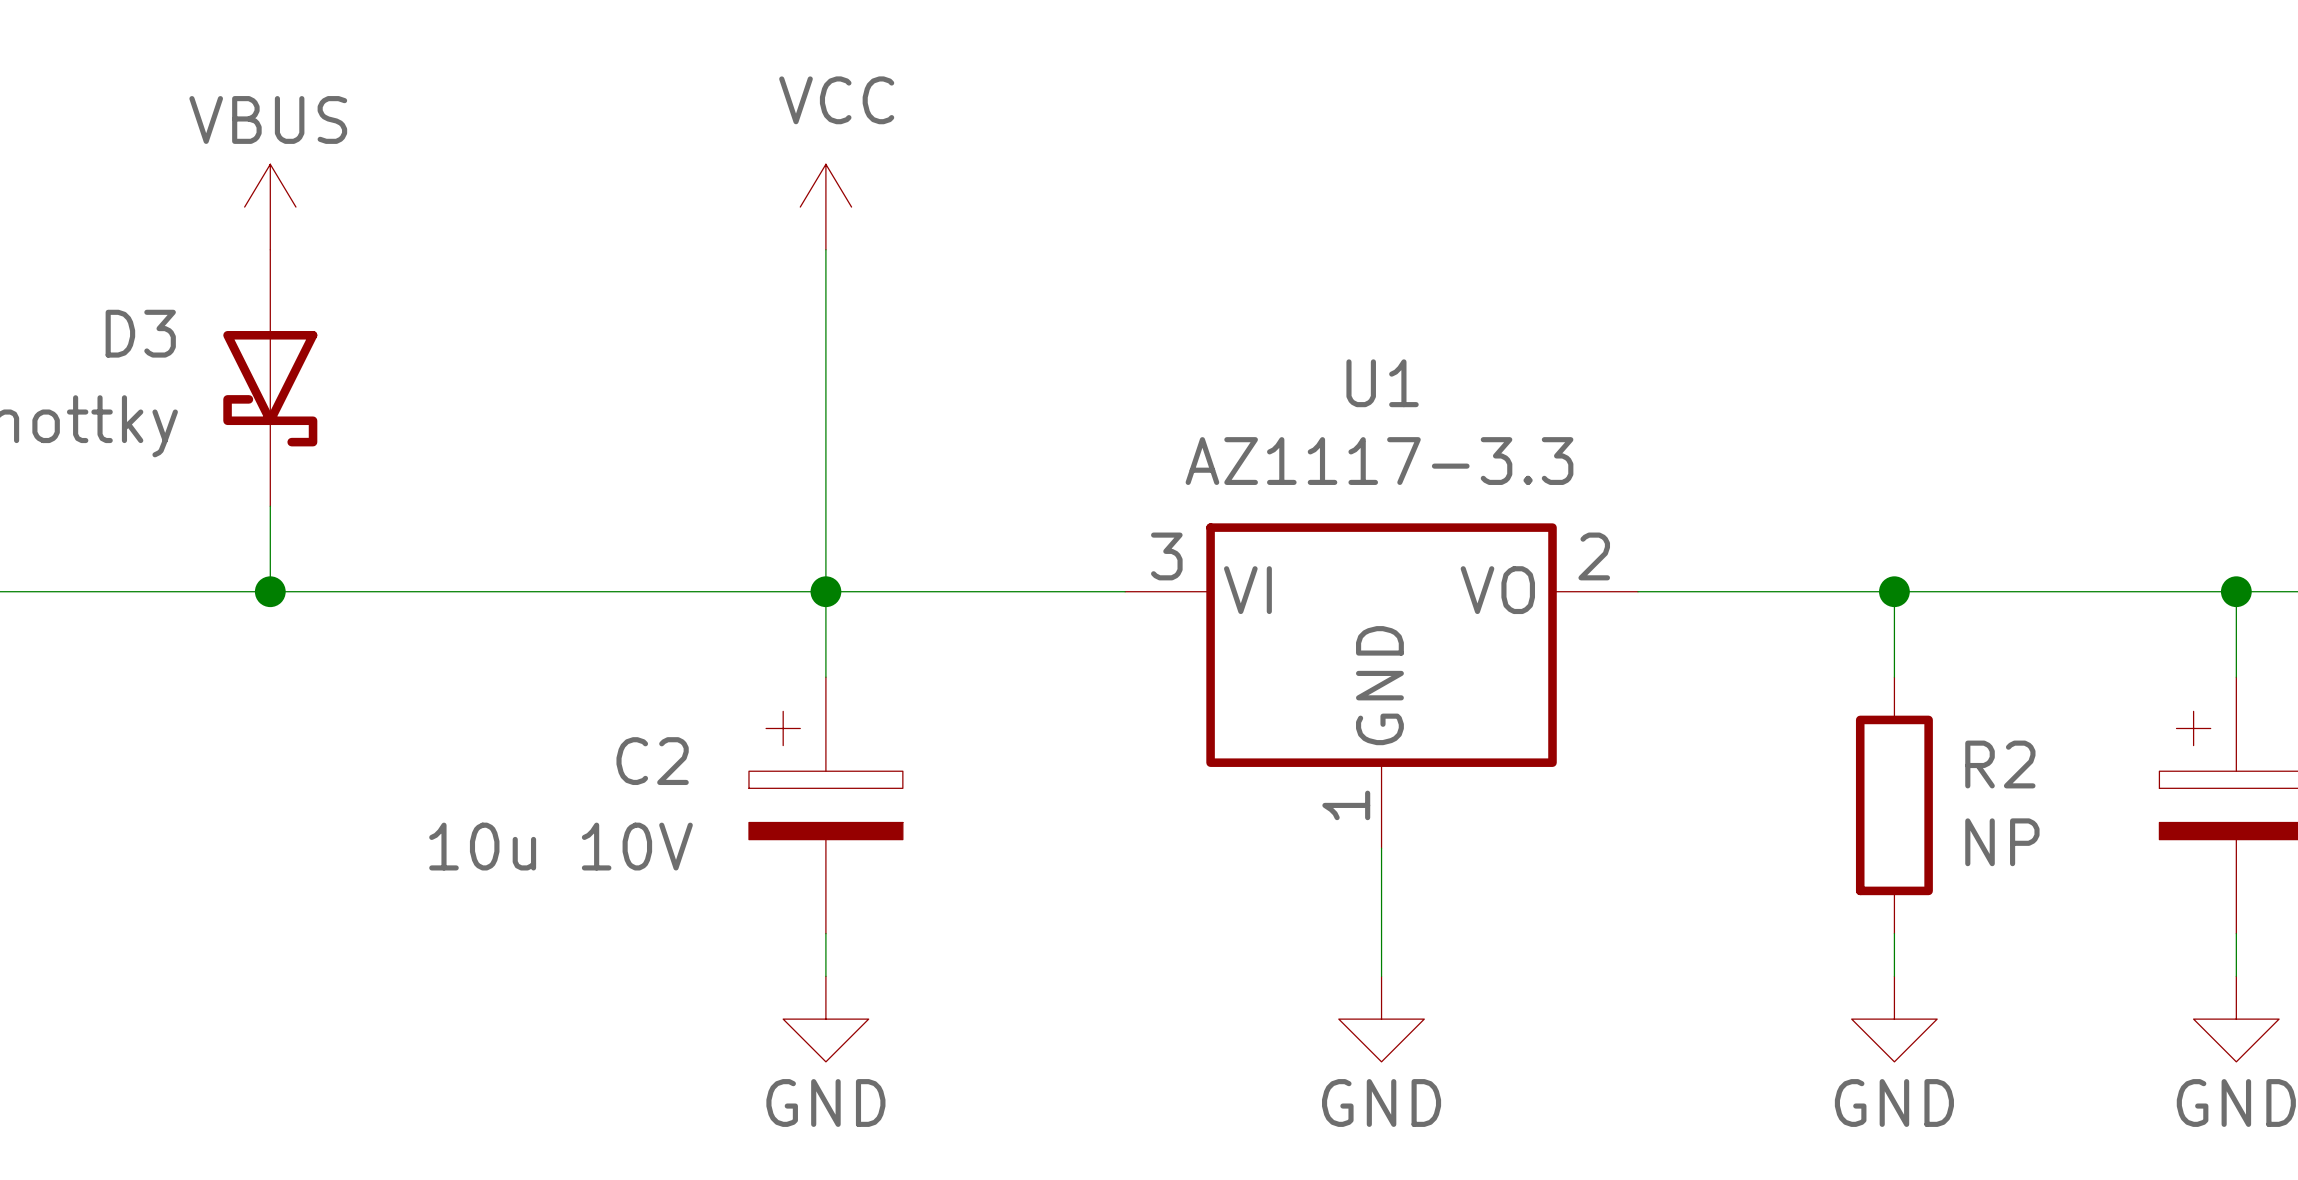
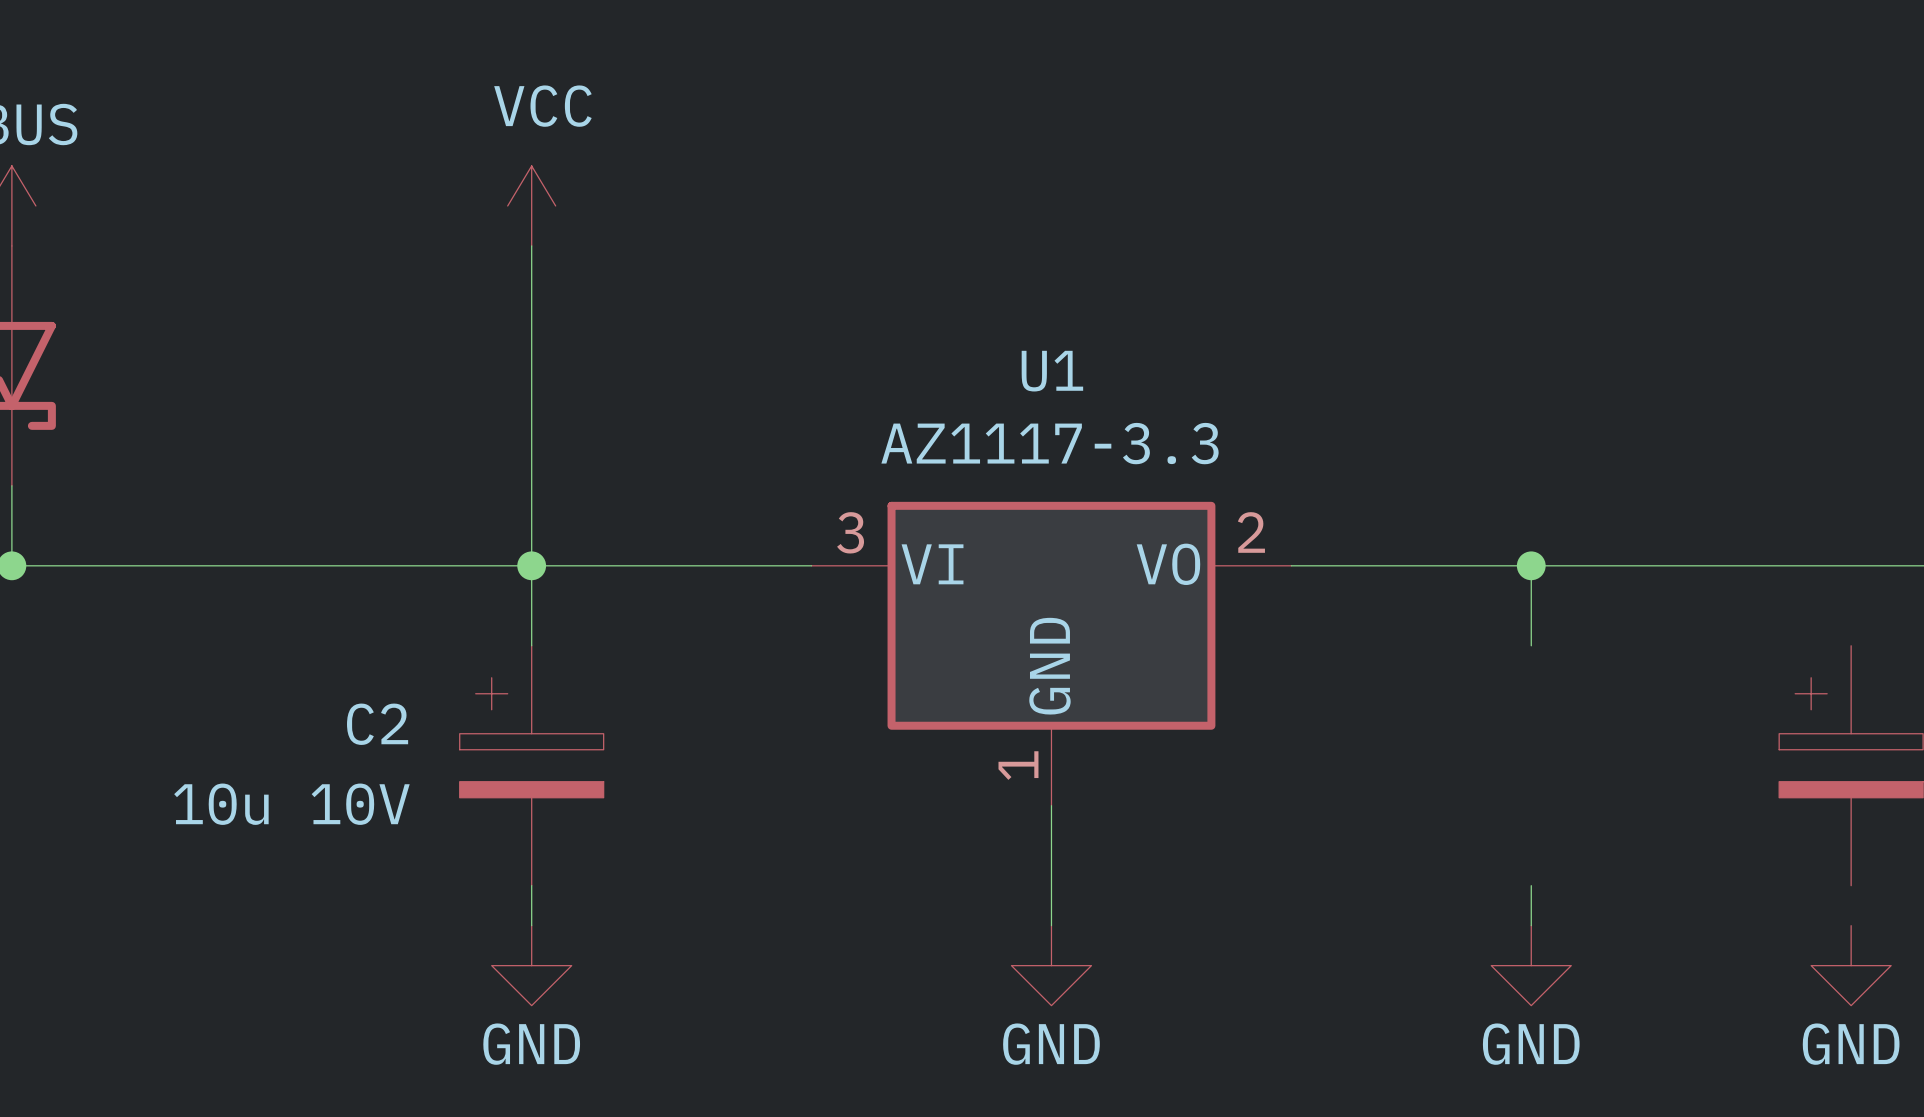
wire: (2236, 591) (2236, 677) -> none
junction: (2236, 591) -> none
R2: NP (1894, 805) -> none
wire: (2236, 933) (2236, 976) -> none

